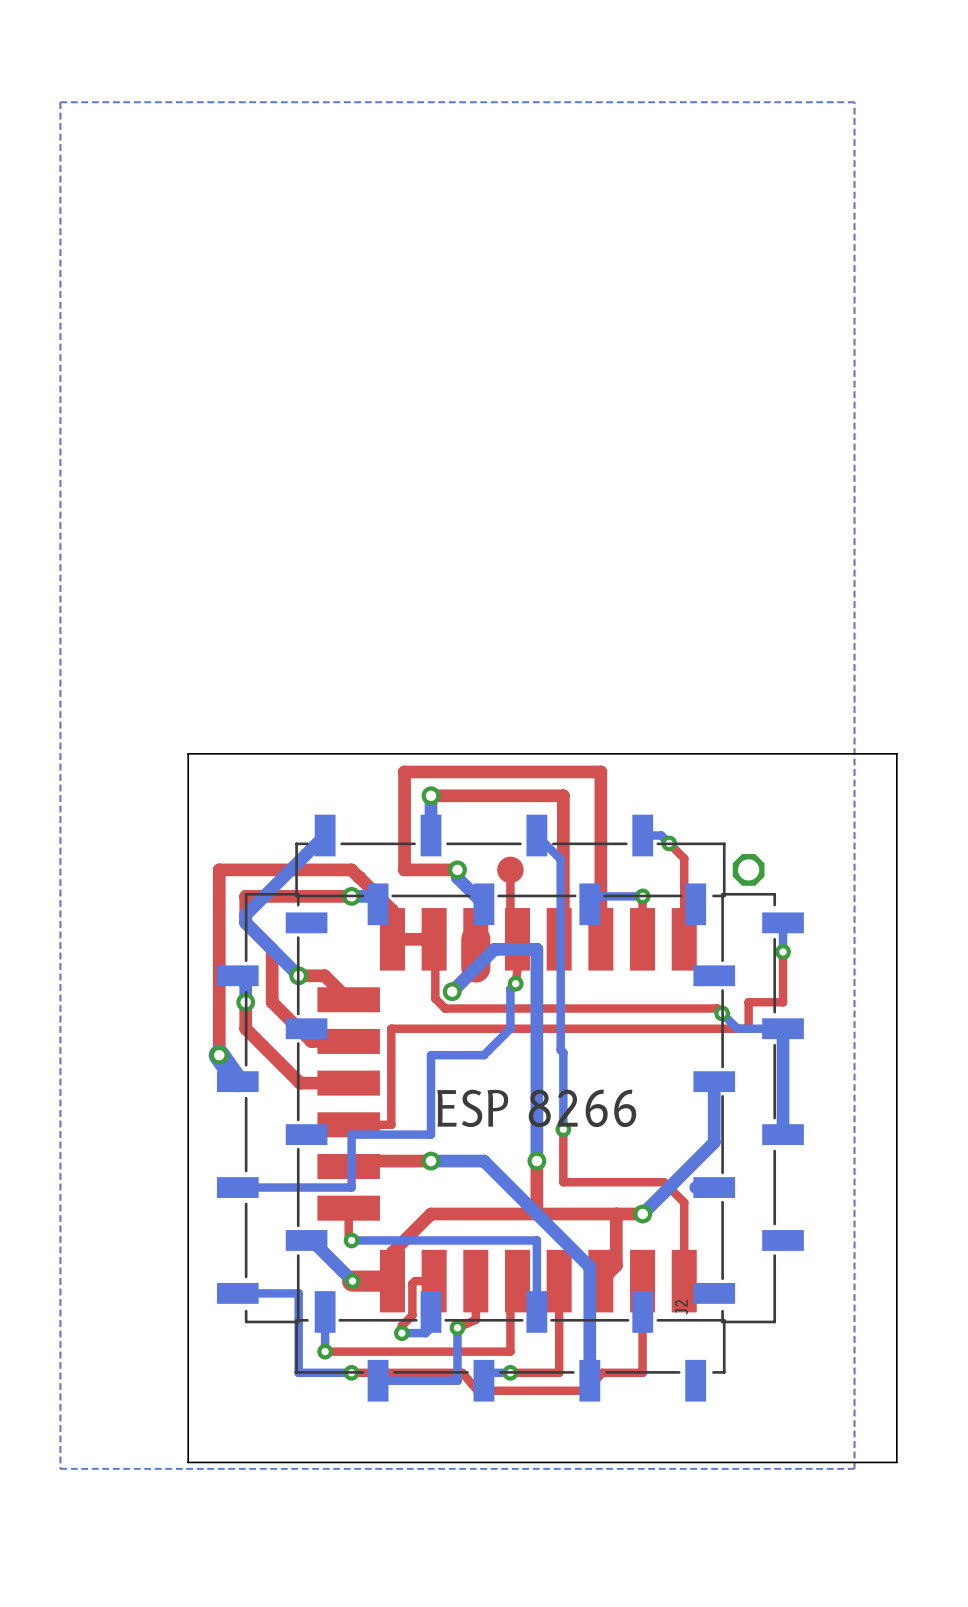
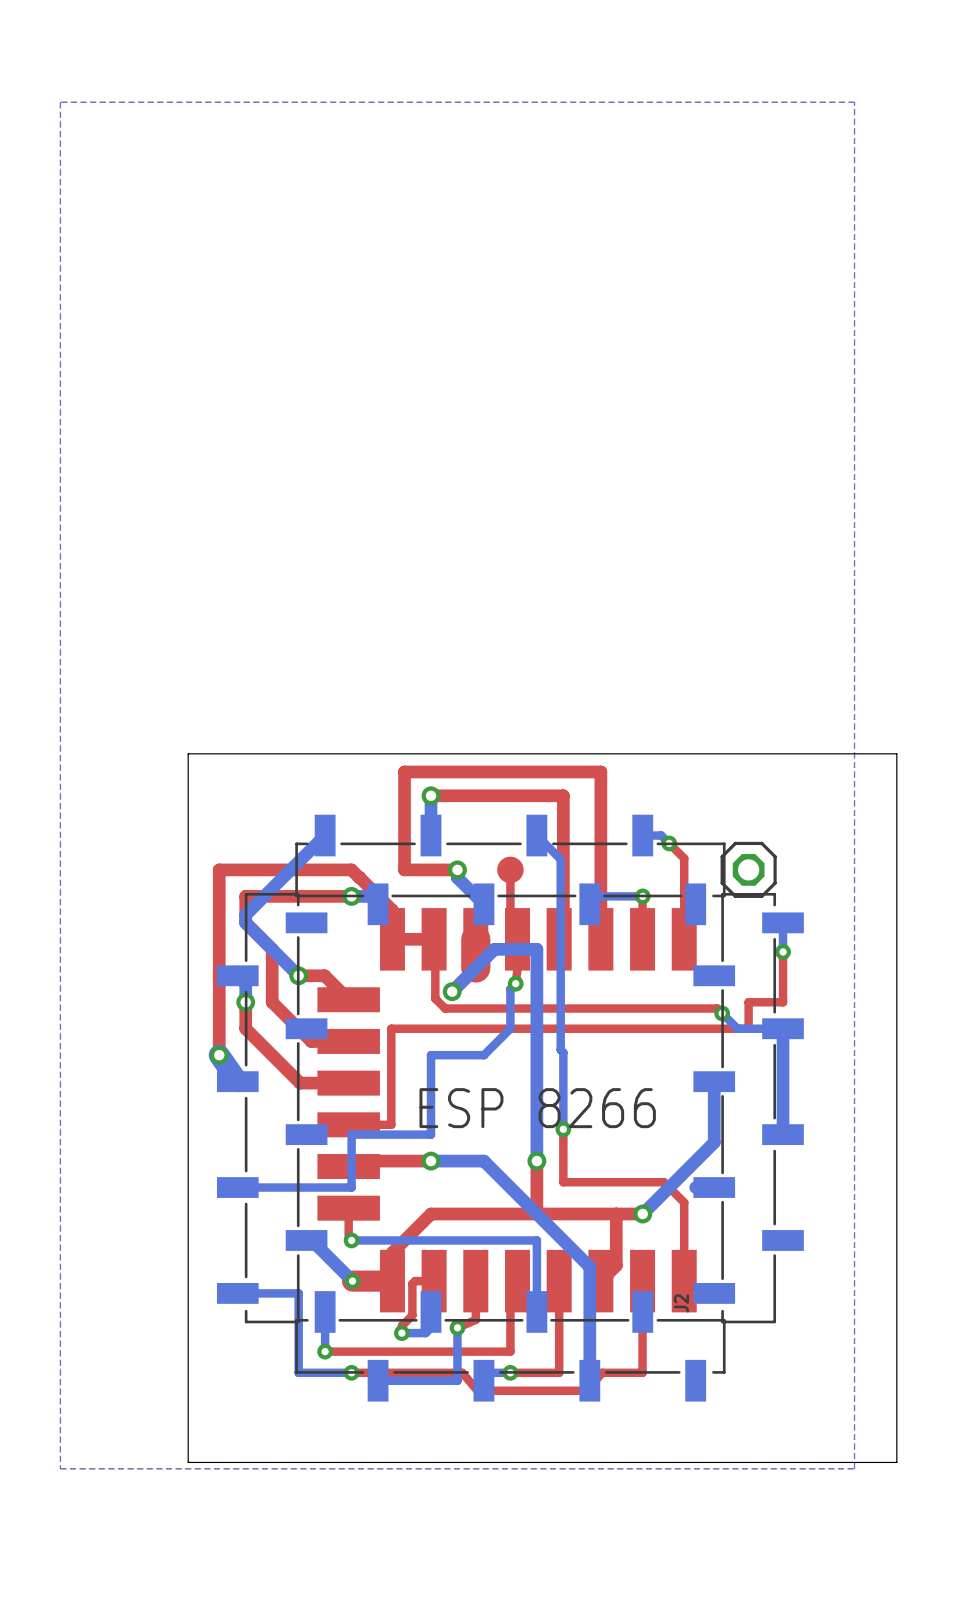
part side: top (748, 869) -> bottom (748, 869)

